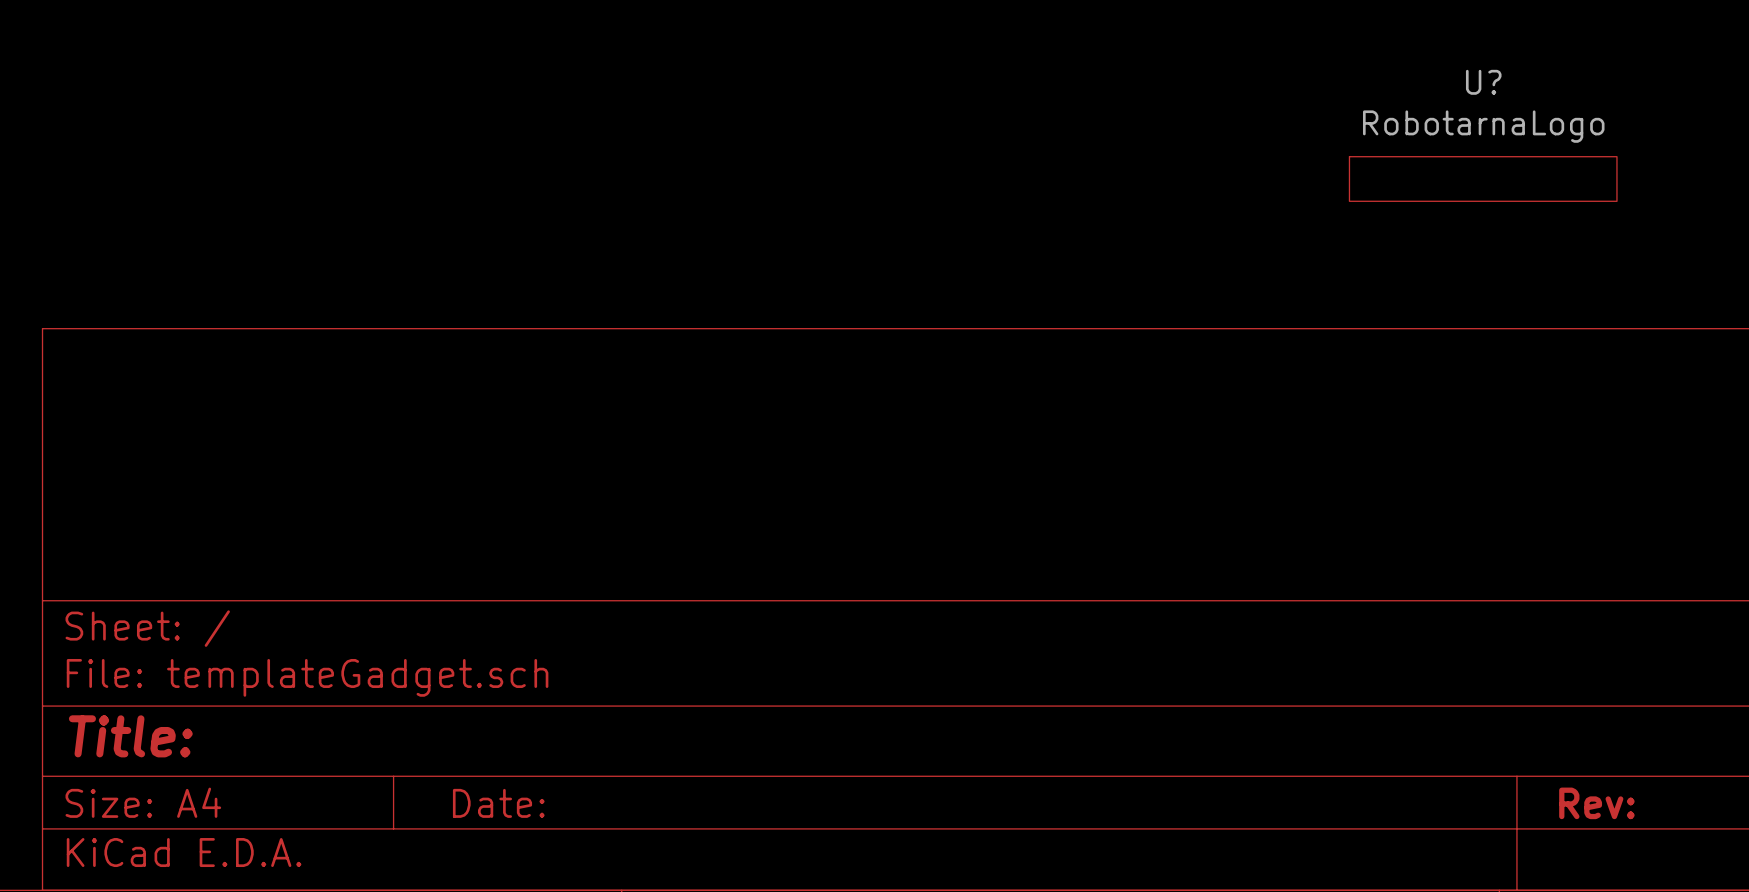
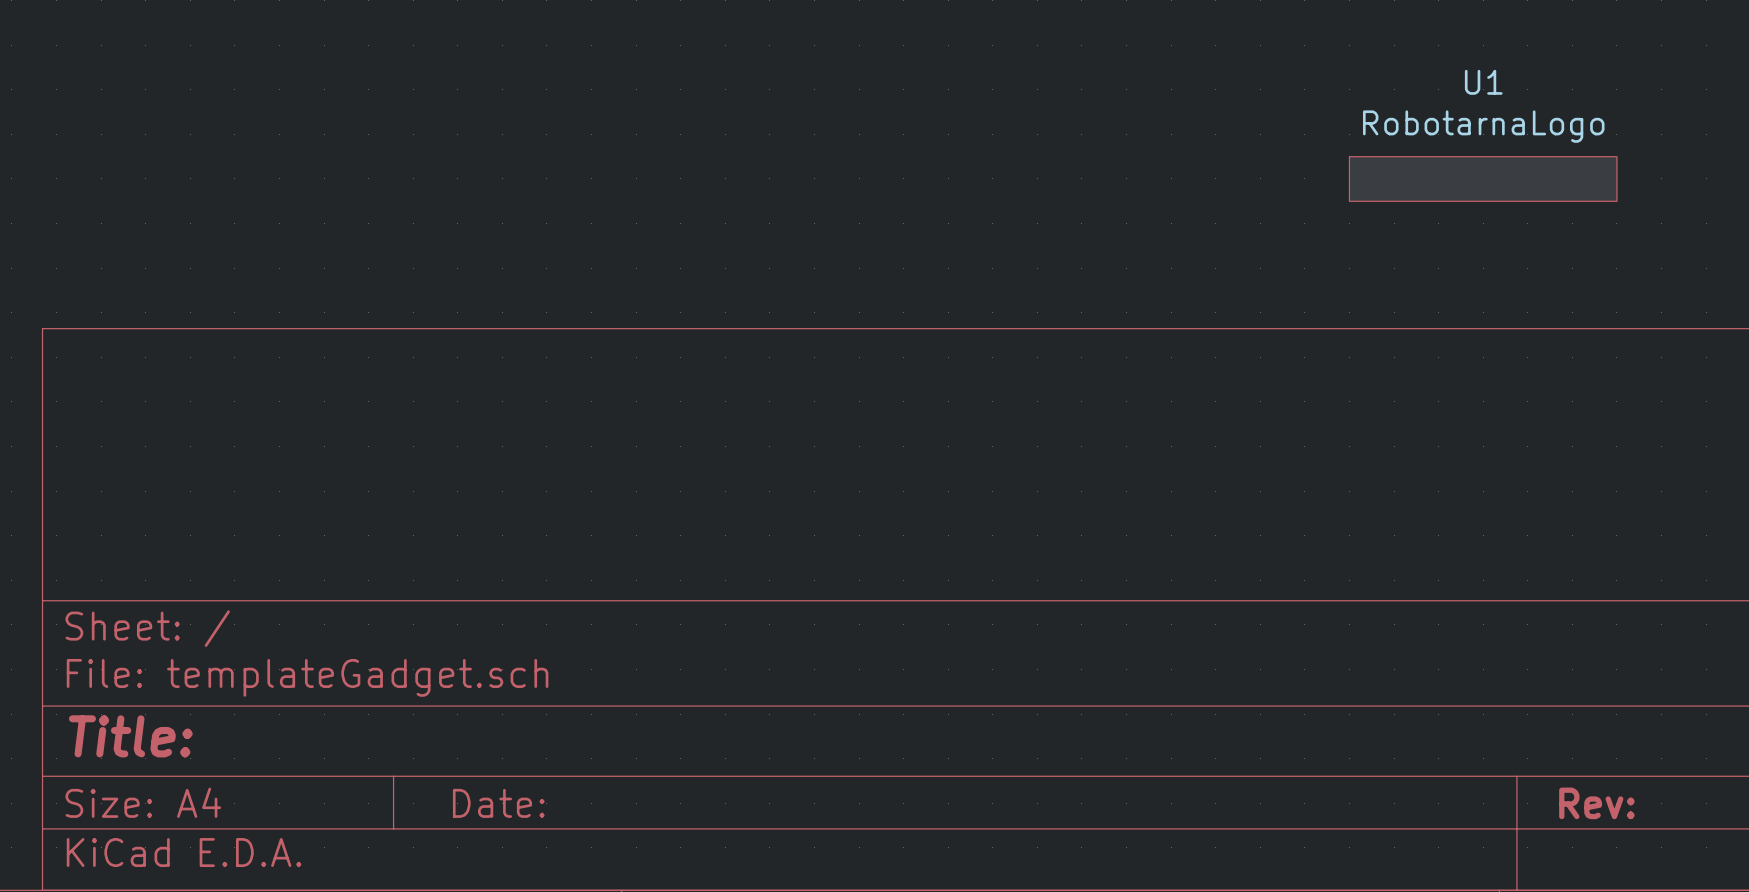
U? name: U? (1483, 82) -> U1 (1483, 82)

